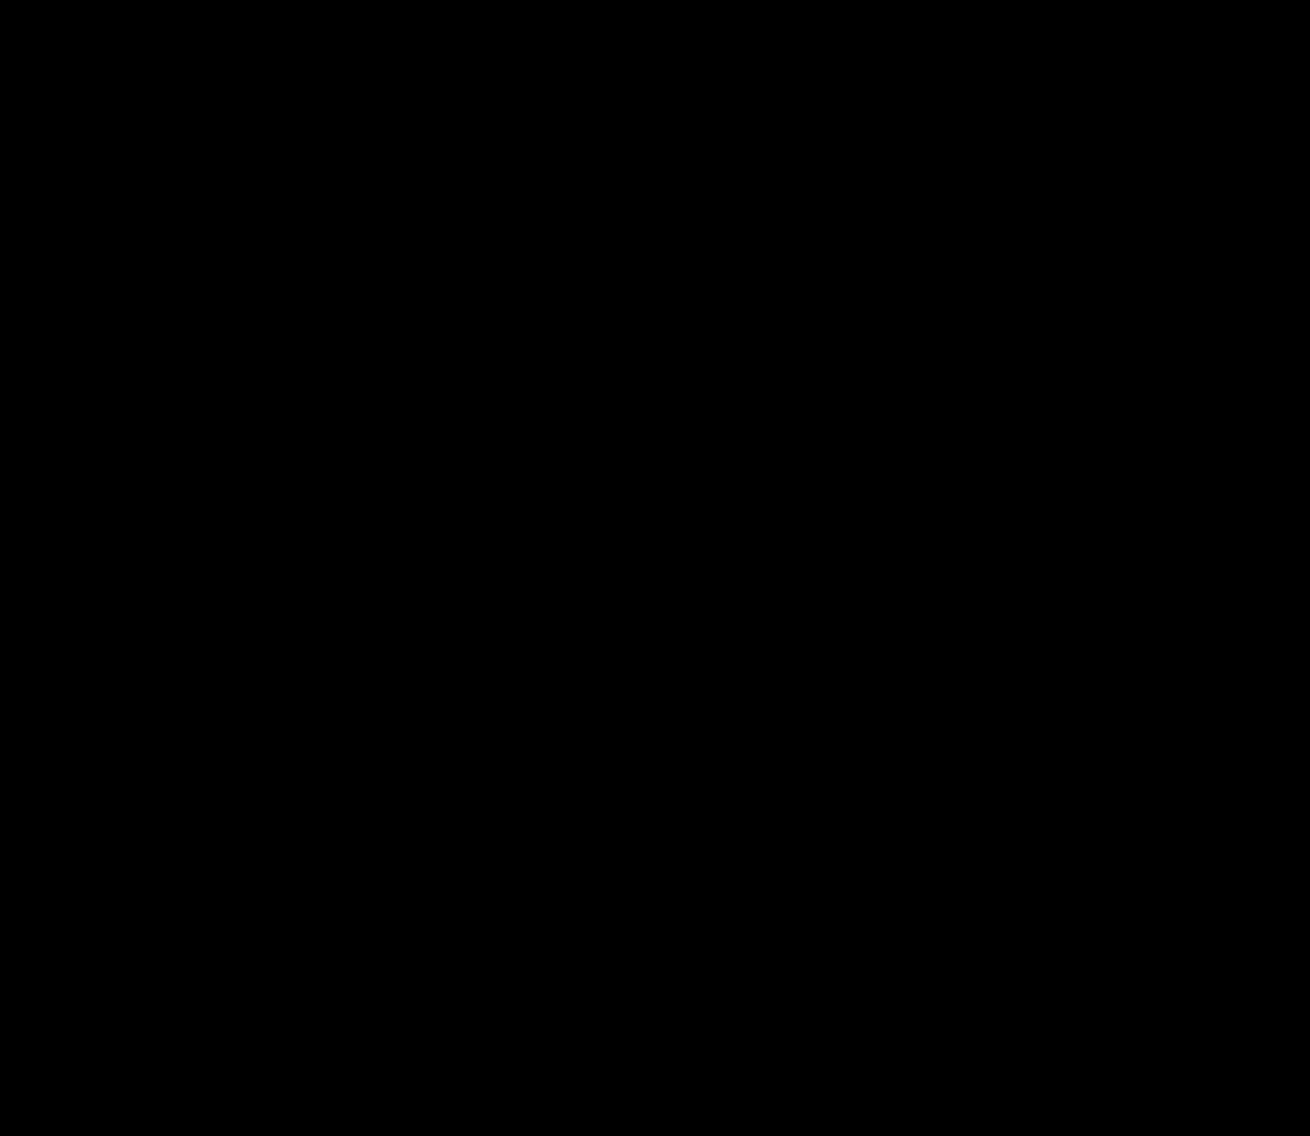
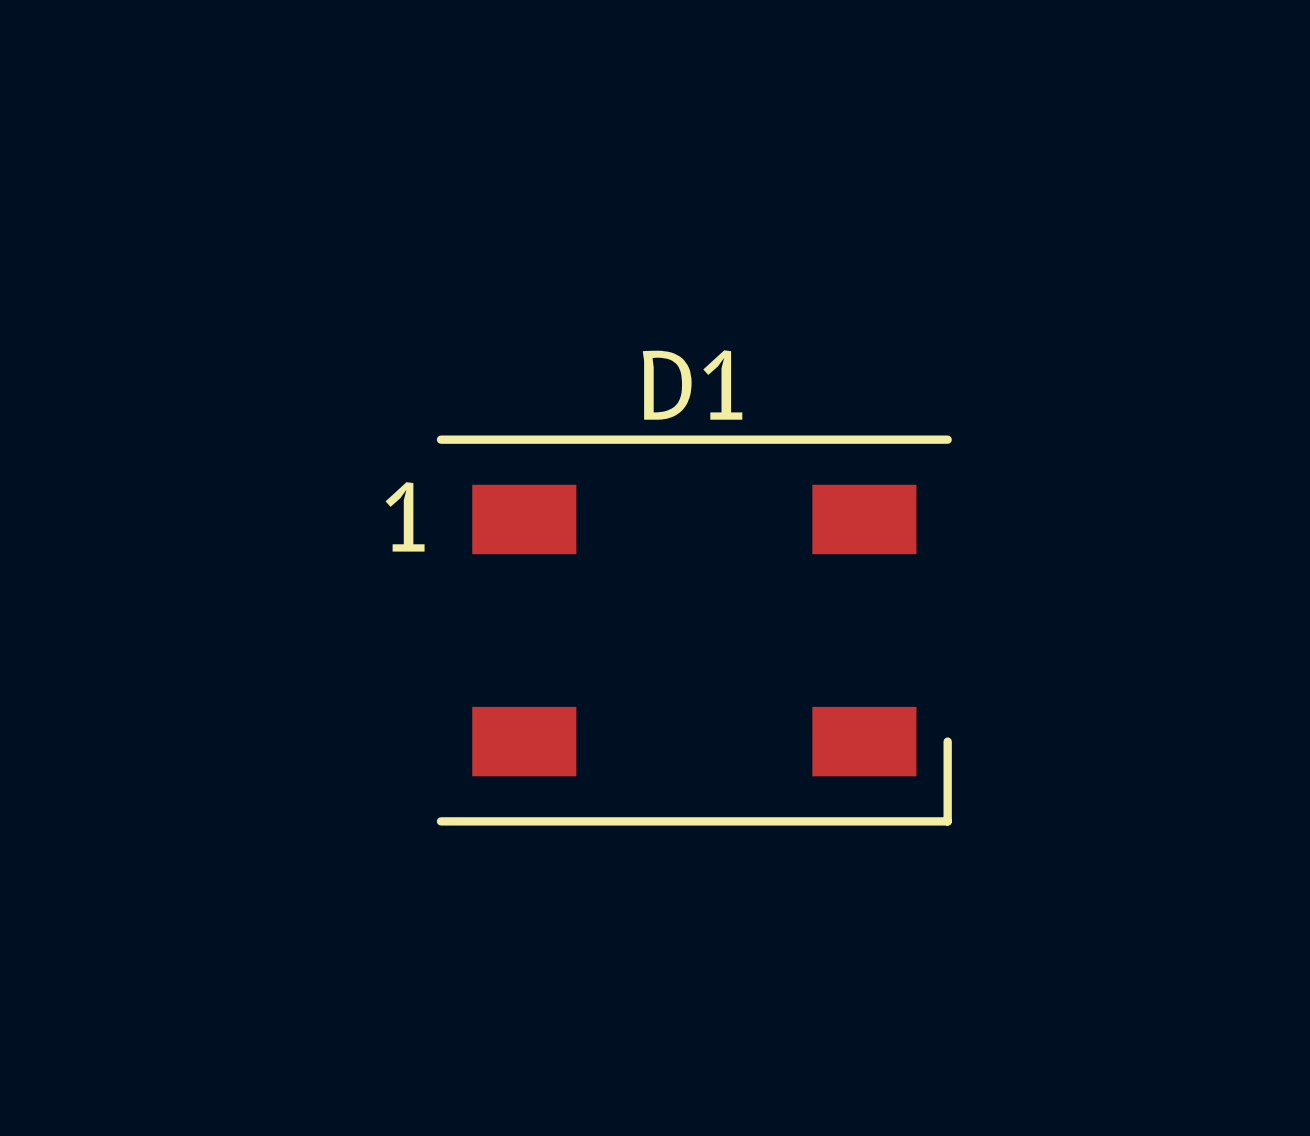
D1: none -> (694, 630)

